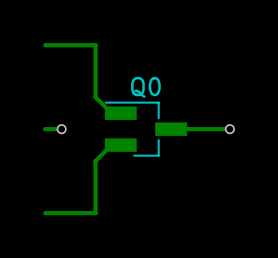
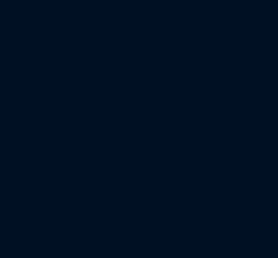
track: (45, 45) (95, 45) (95, 97) (111, 113) (120, 113) -> none
track: (61, 129) (45, 129) -> none
via: (61, 129) -> none
Q0: (145, 129) -> none
track: (229, 129) (171, 129) -> none
via: (229, 129) -> none
track: (120, 145) (111, 145) (95, 161) (95, 213) (45, 213) -> none

